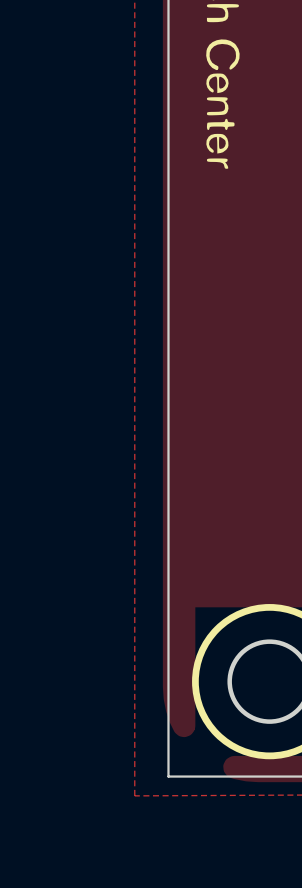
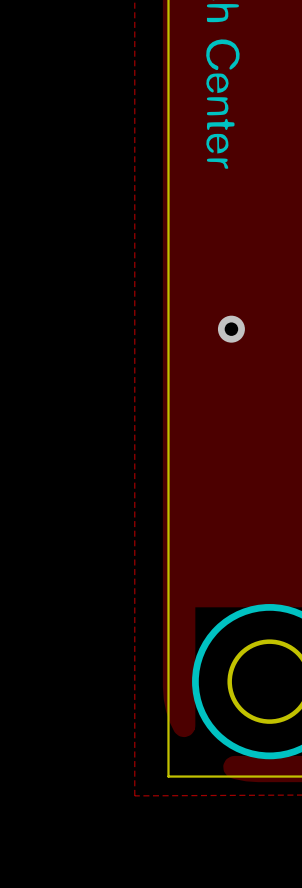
via: none -> (231, 329)

